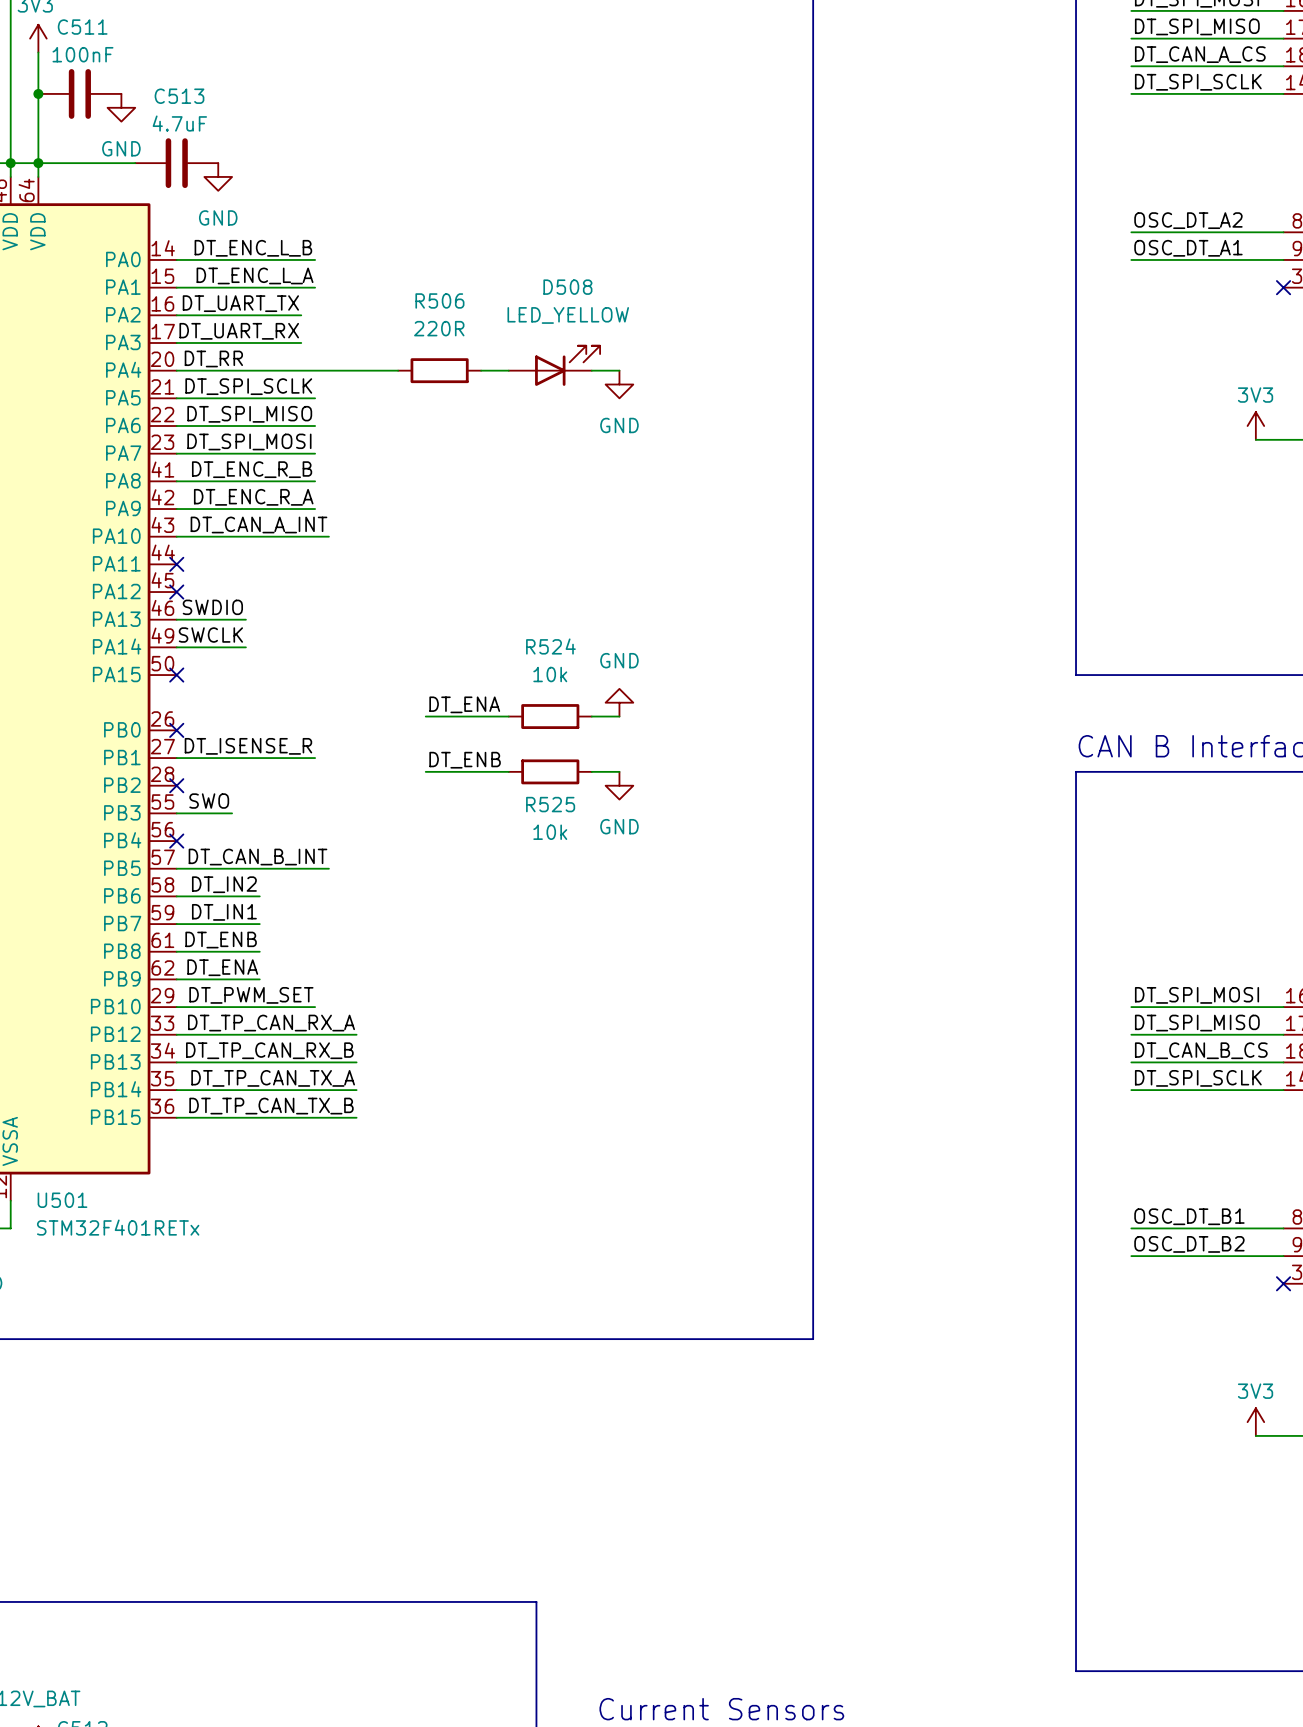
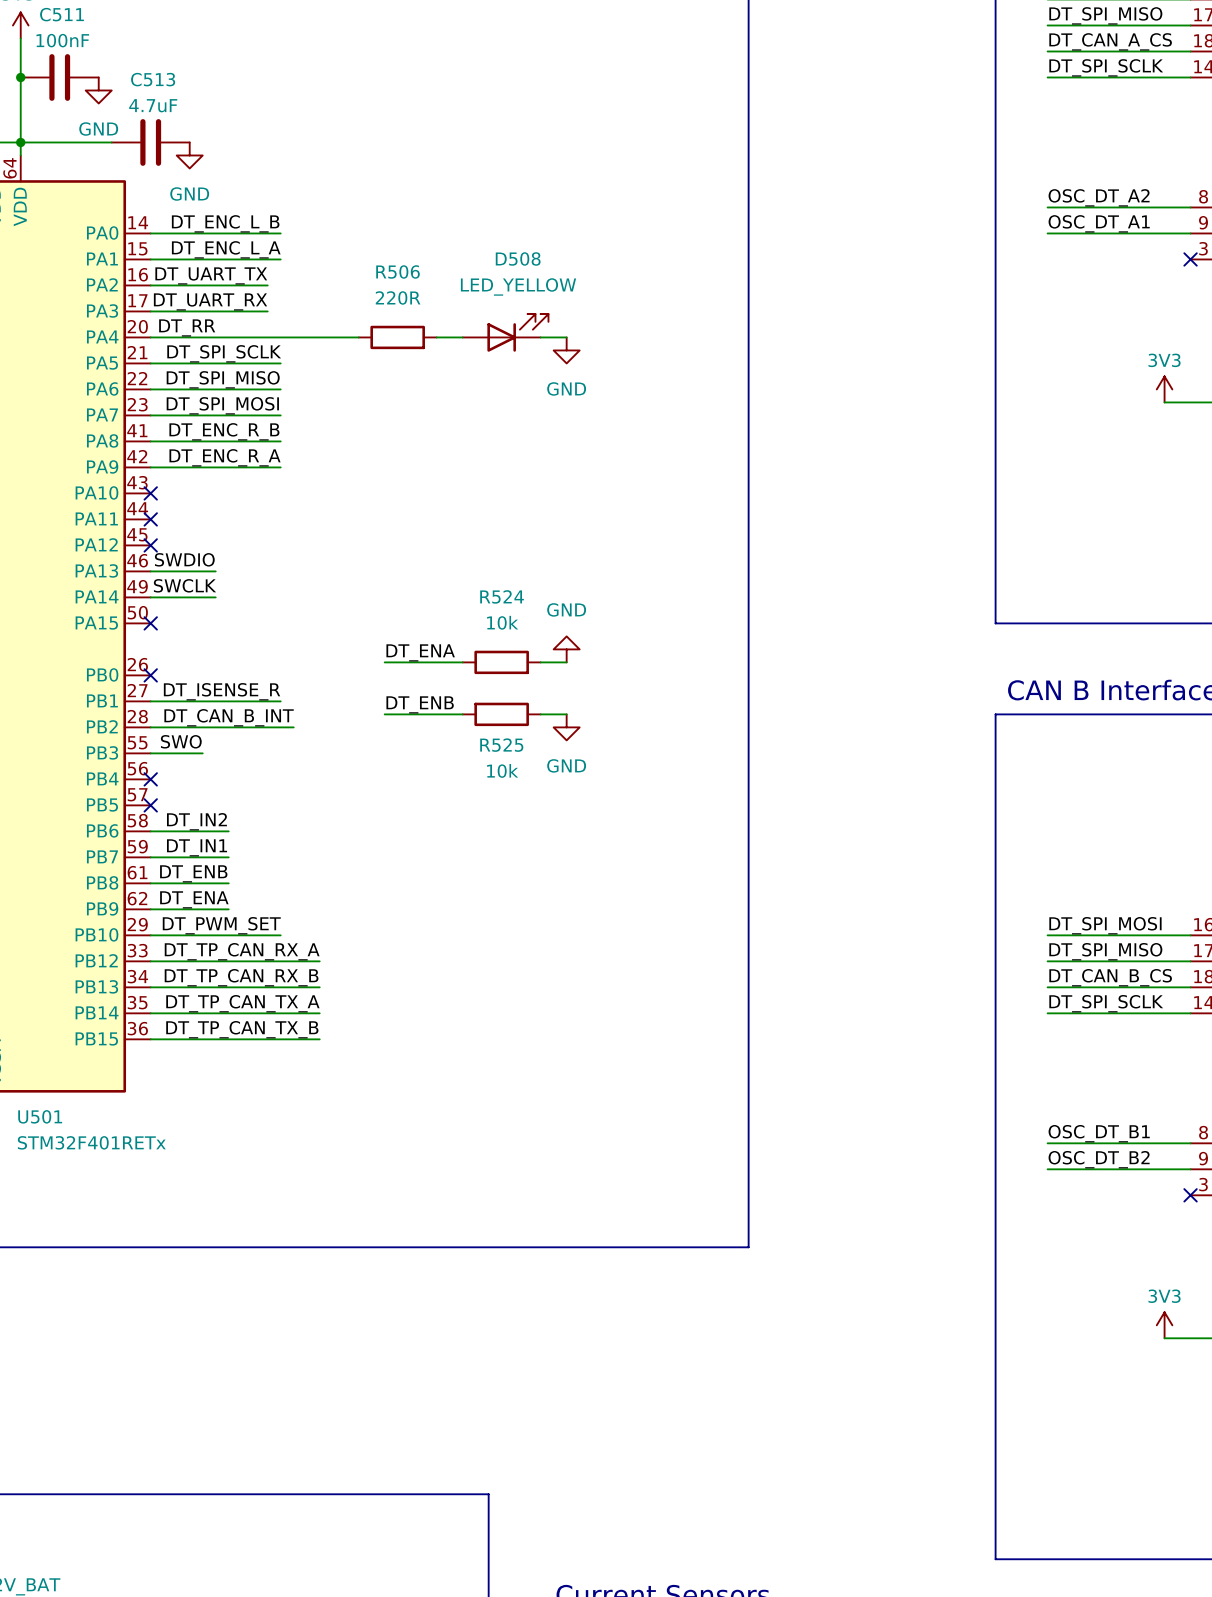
label: DT_CAN_A_INT (258, 524) -> none
wire: (176, 536) (328, 536) -> none
no-connect mark: none -> (150, 493)
no-connect mark: (176, 785) -> none
label position: DT_CAN_B_INT (257, 857) -> DT_CAN_B_INT (229, 717)
wire: (176, 868) (328, 868) -> (150, 727) (293, 727)
no-connect mark: none -> (150, 805)

